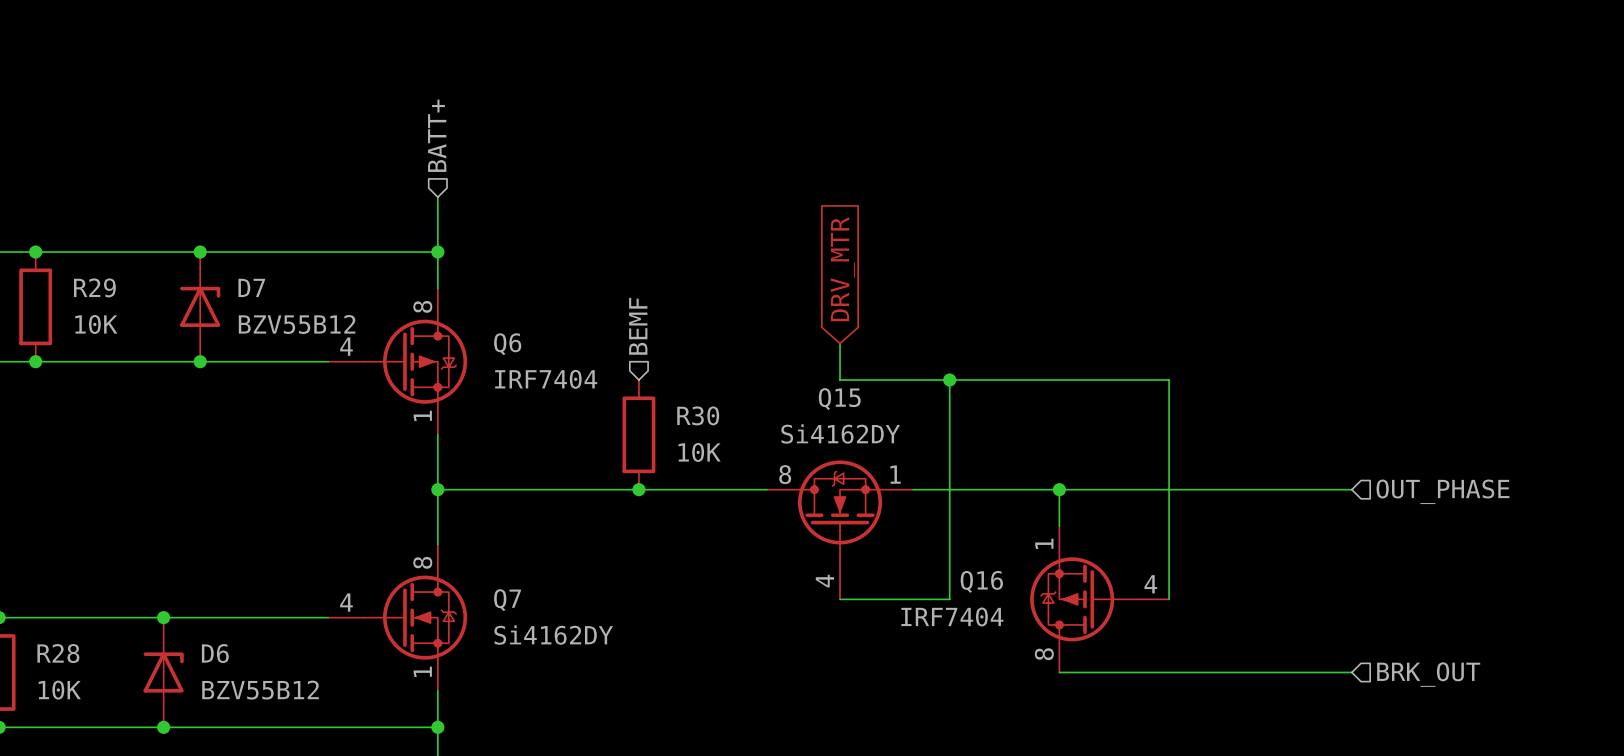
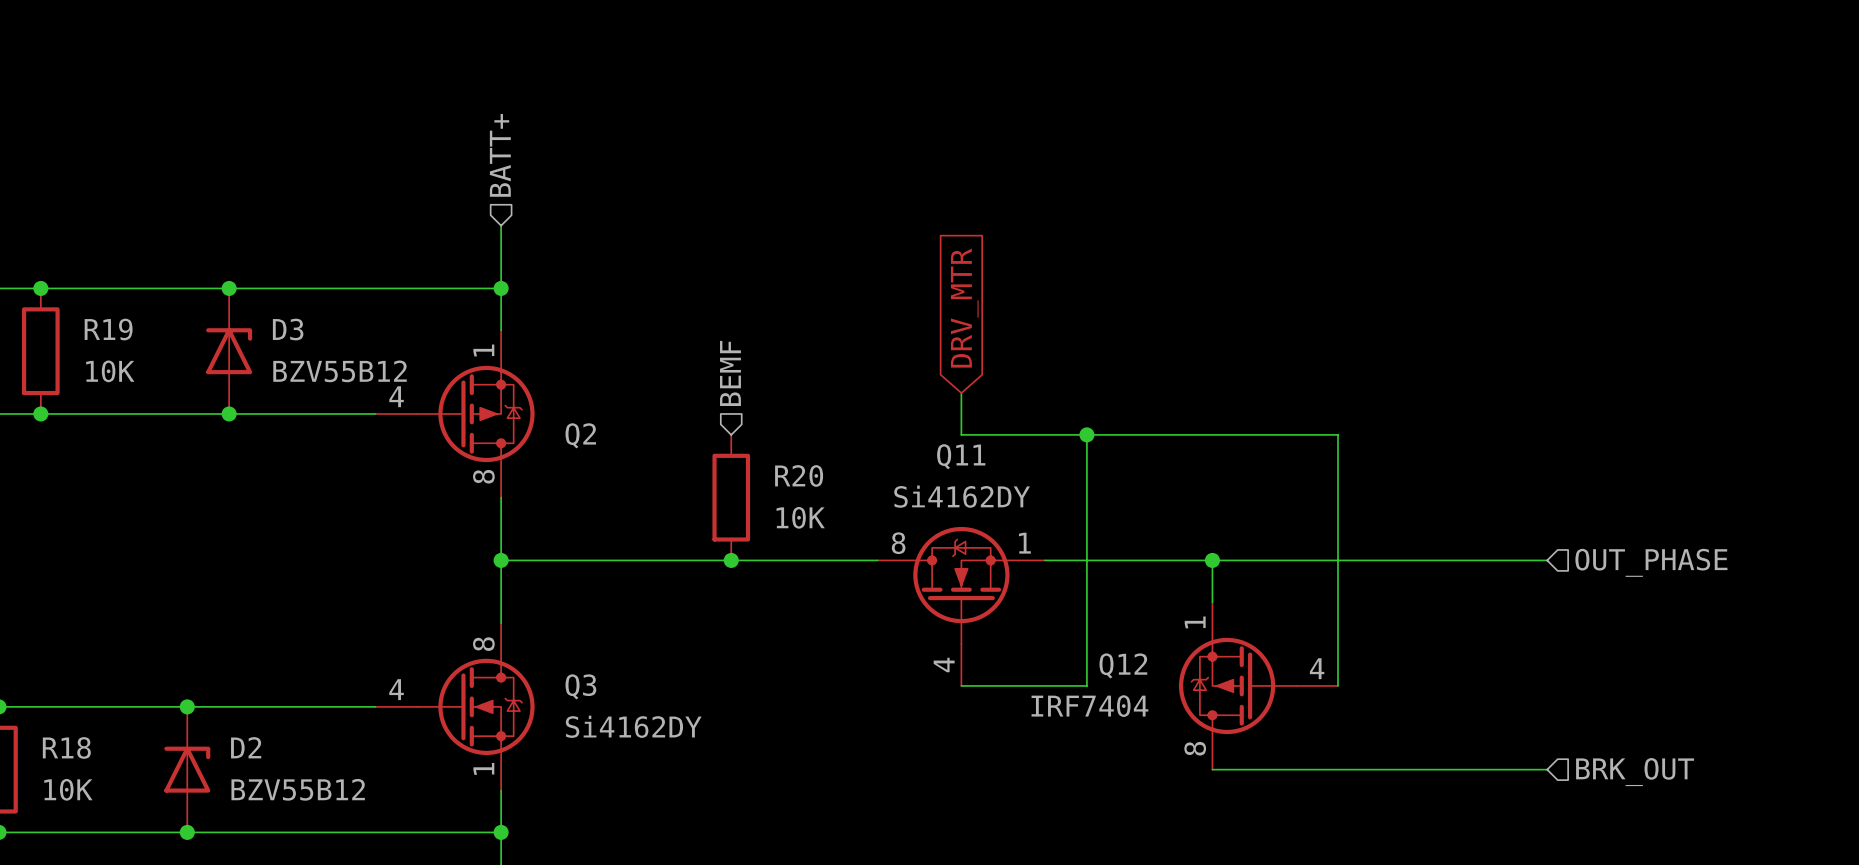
R29 name: R29 (94, 287) -> R19 (108, 329)
D7 name: D7 (251, 287) -> D3 (288, 329)
Q6: IRF7404 (397, 361) -> none
Q2: none -> (455, 413)
Q15 name: Q15 (839, 399) -> Q11 (961, 456)
R30 name: R30 (698, 415) -> R20 (799, 475)
Q16 name: Q16 (981, 581) -> Q12 (1123, 665)
Q7 name: Q7 (507, 600) -> Q3 (580, 686)
R28 name: R28 (58, 653) -> R18 (66, 747)
D6 name: D6 (215, 653) -> D2 (246, 747)

